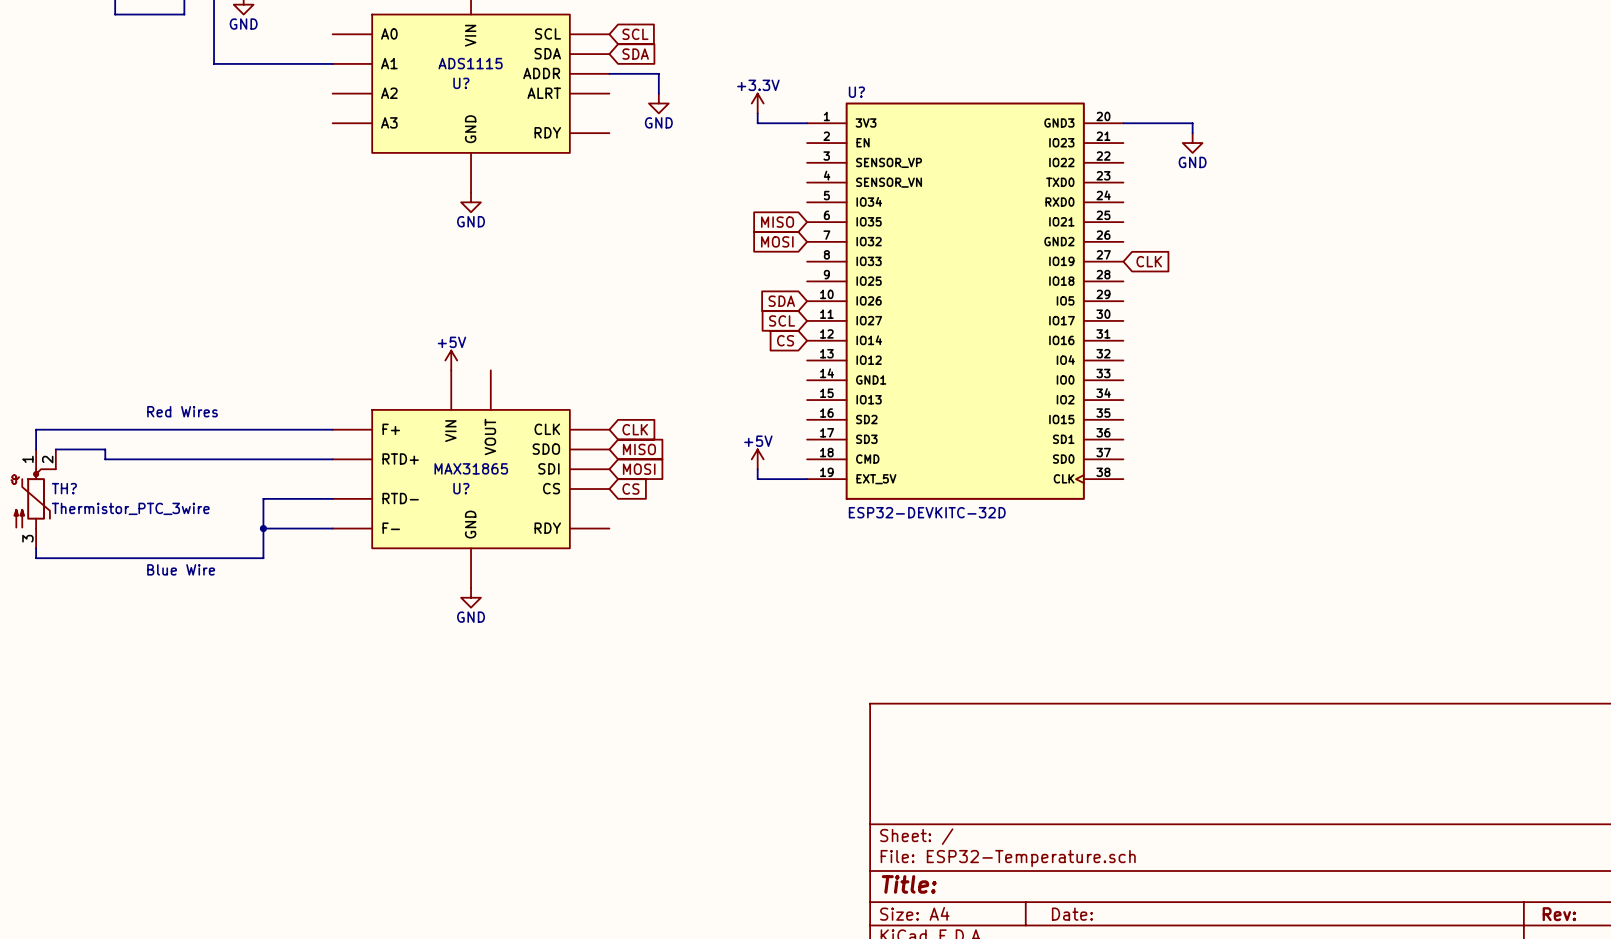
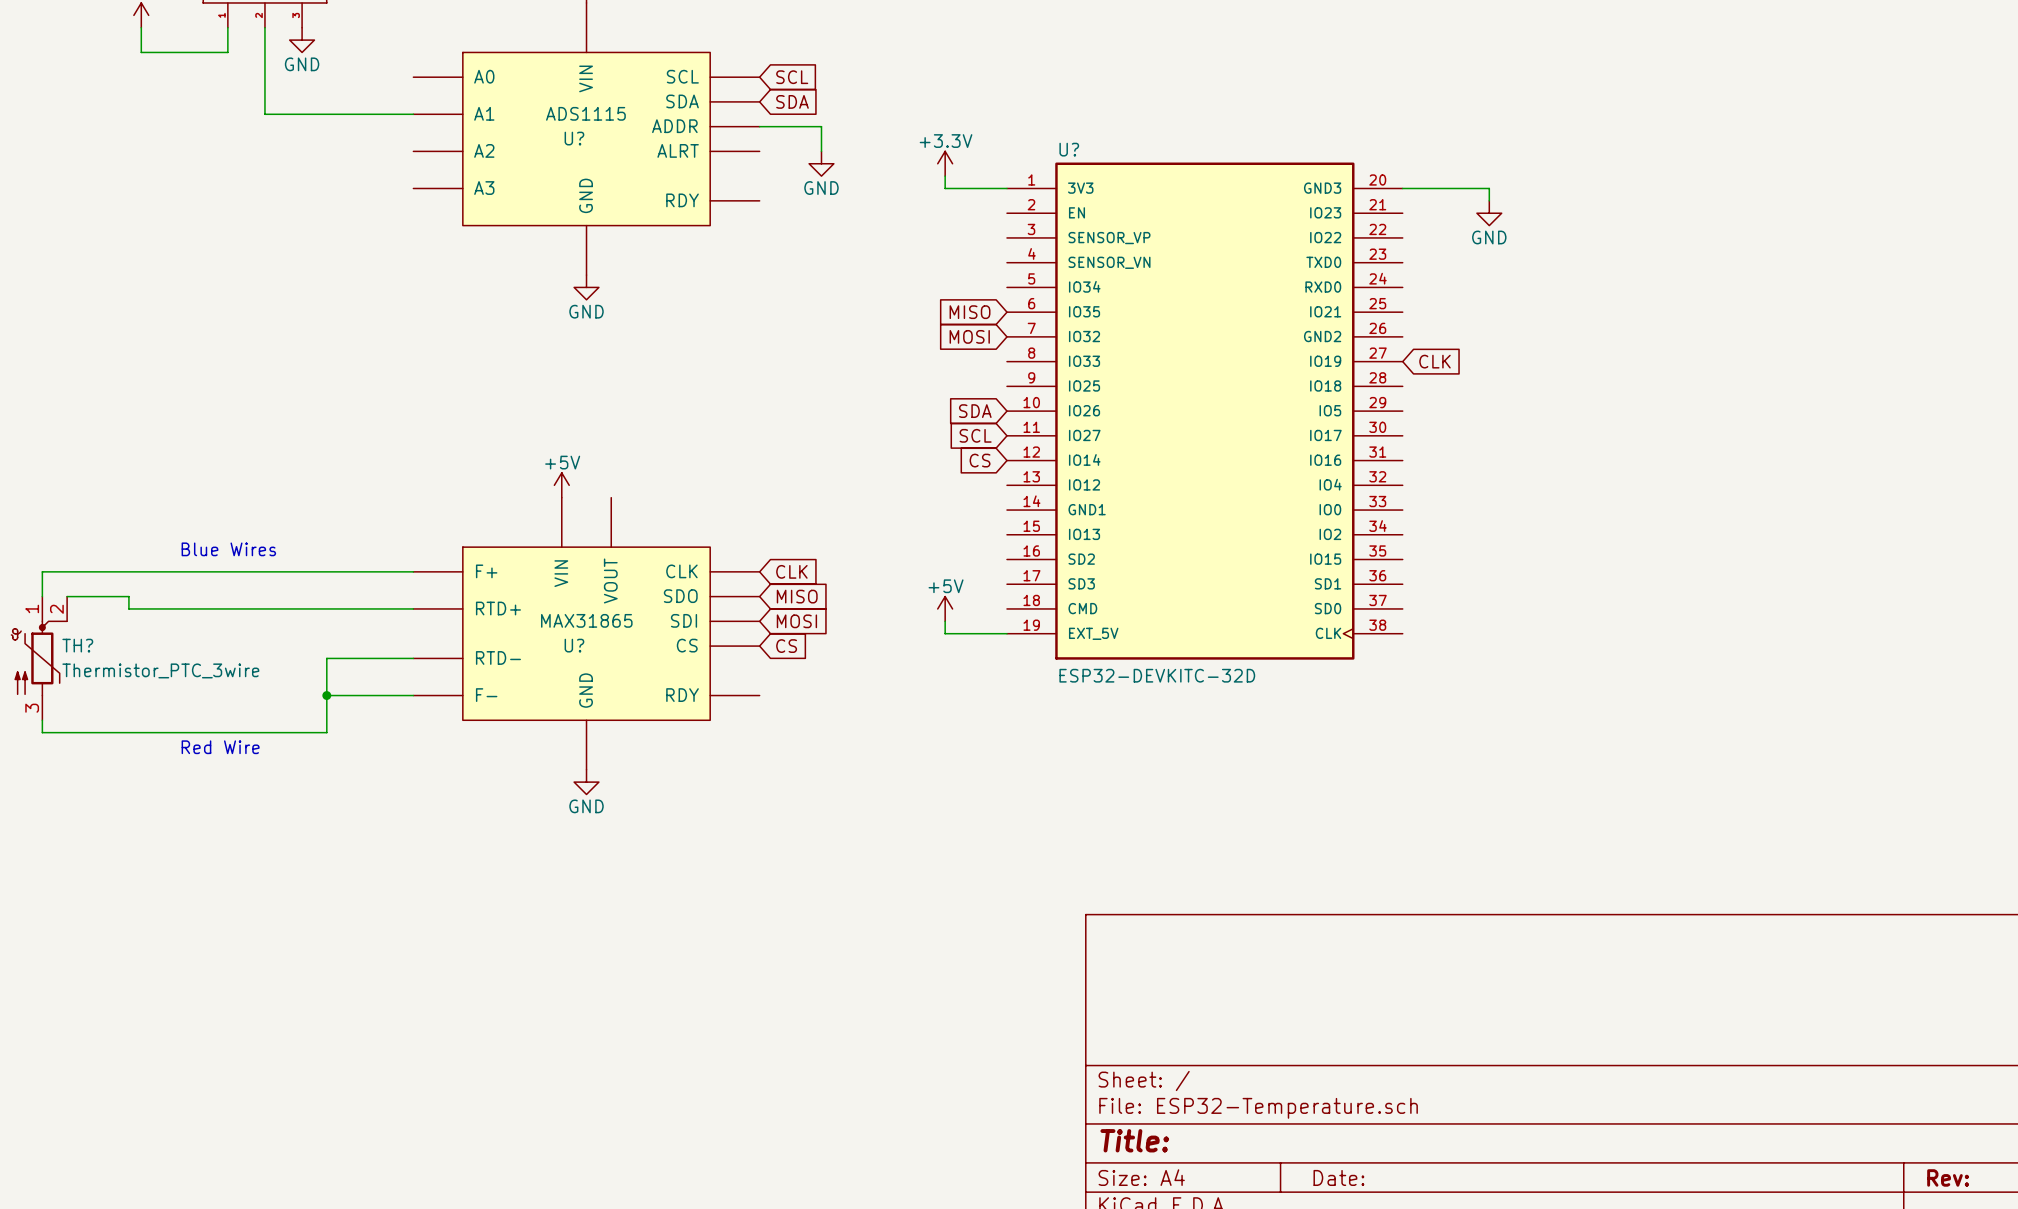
text: Red Wires (182, 411) -> Blue Wires (228, 549)
text: Blue Wire (181, 569) -> Red Wire (220, 747)

